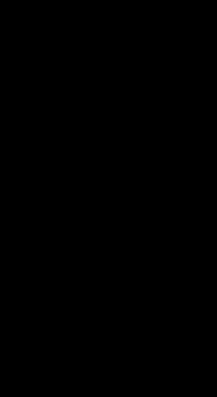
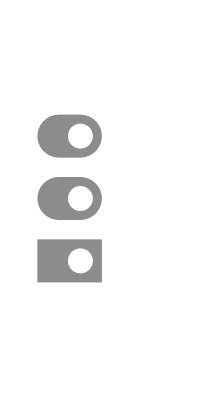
part: none -> (69, 198)

